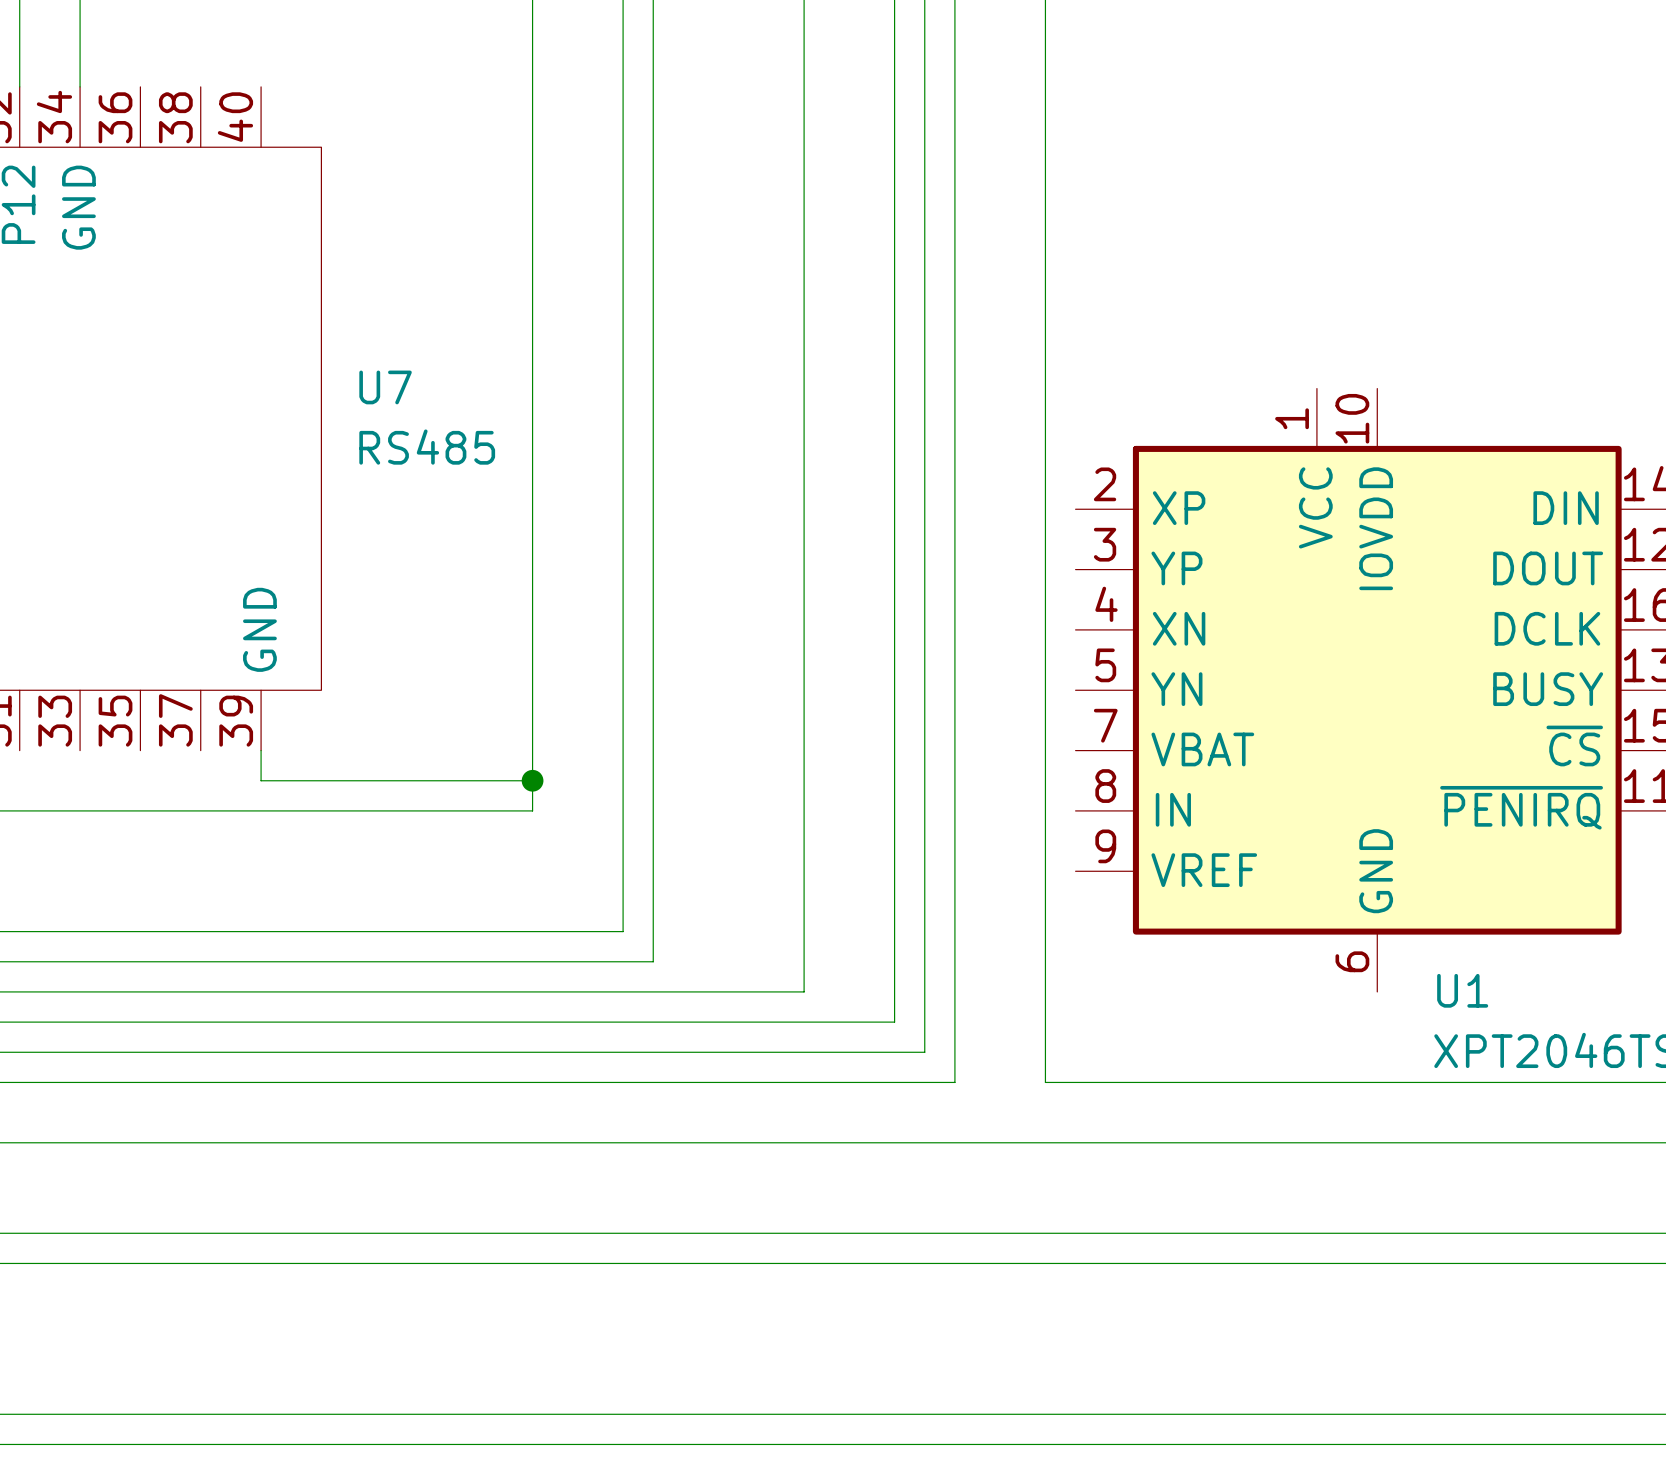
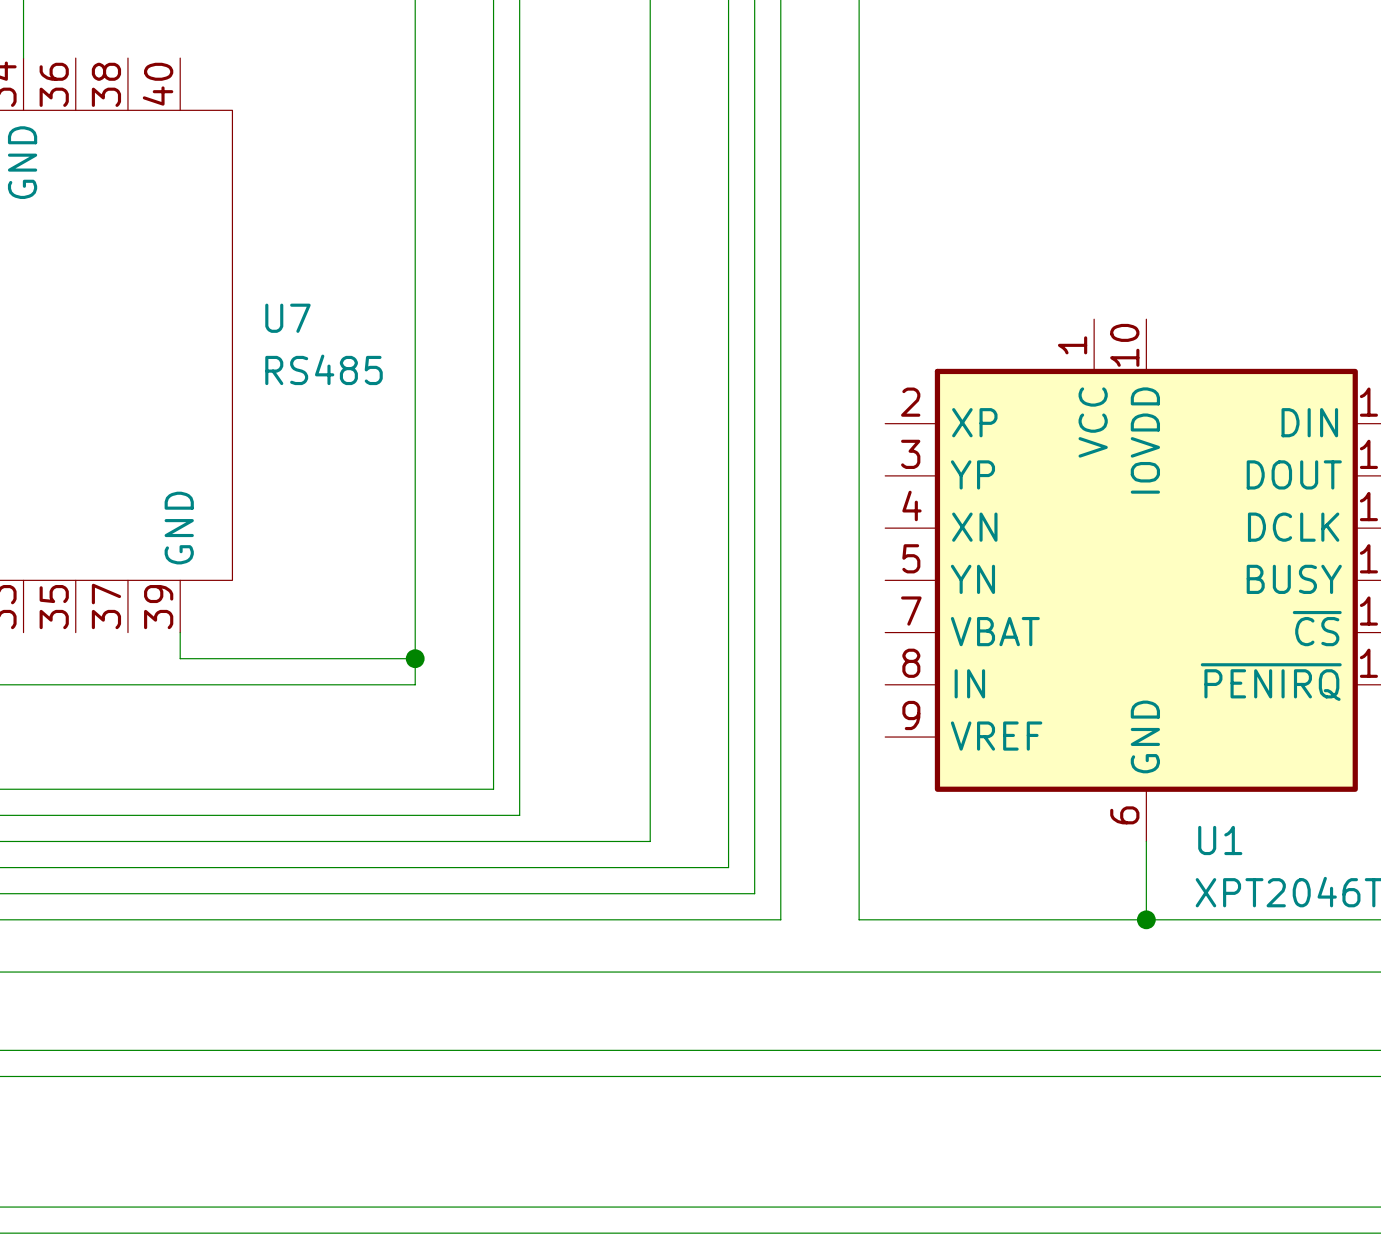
wire: none -> (1146, 841) (1146, 919)
junction: none -> (1146, 919)

